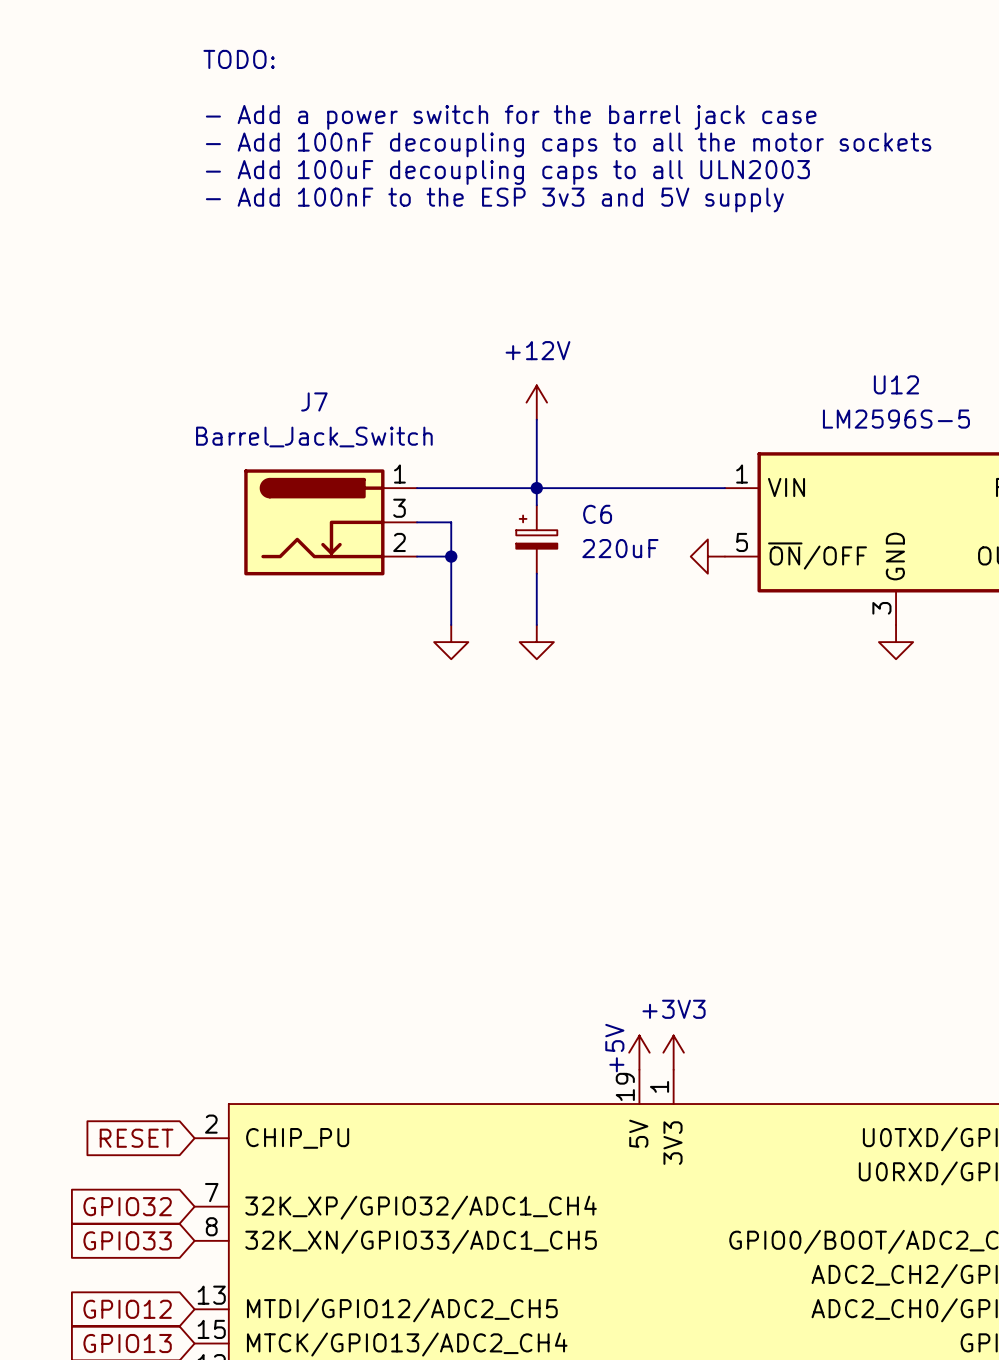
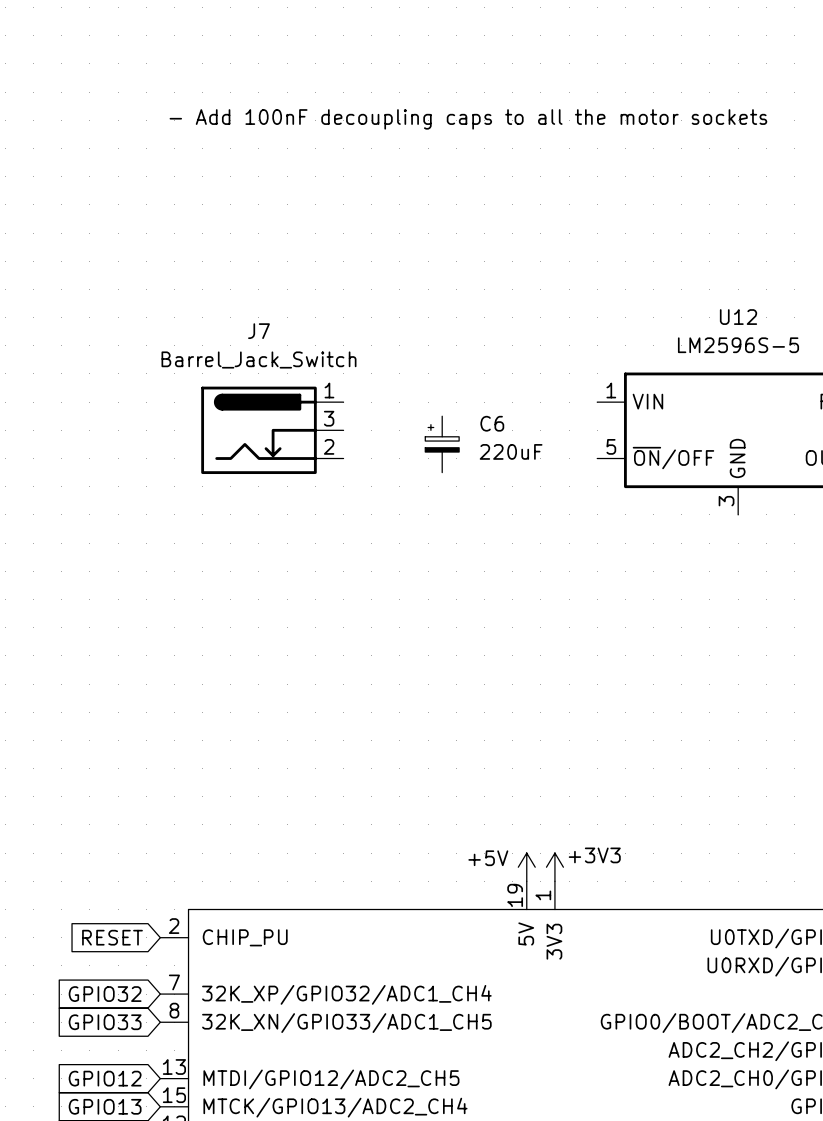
text: TODO: (239, 59) -> none
text: - Add a power switch for the barrel jack case (511, 117) -> none
text: - Add 100uF decoupling caps to all ULN2003 (507, 172) -> none
text: - Add 100nF to the ESP 3v3 and 5V supply (494, 200) -> none
power symbol: +12V (536, 402) -> none
wire: (536, 419) (536, 505) -> none
wire: (417, 488) (724, 488) -> none
junction: (536, 488) -> none
wire: (417, 522) (451, 522) (451, 625) -> none
wire: (417, 556) (451, 556) -> none
junction: (451, 556) -> none
power symbol: (707, 556) -> none
wire: (536, 573) (536, 625) -> none
power symbol: (451, 642) -> none
power symbol: (536, 642) -> none
power symbol: (896, 642) -> none
power symbol text position: +3V3 (674, 1009) -> +3V3 (594, 855)
power symbol text rotation: 0° (614, 1048) -> 90° clockwise (488, 858)

